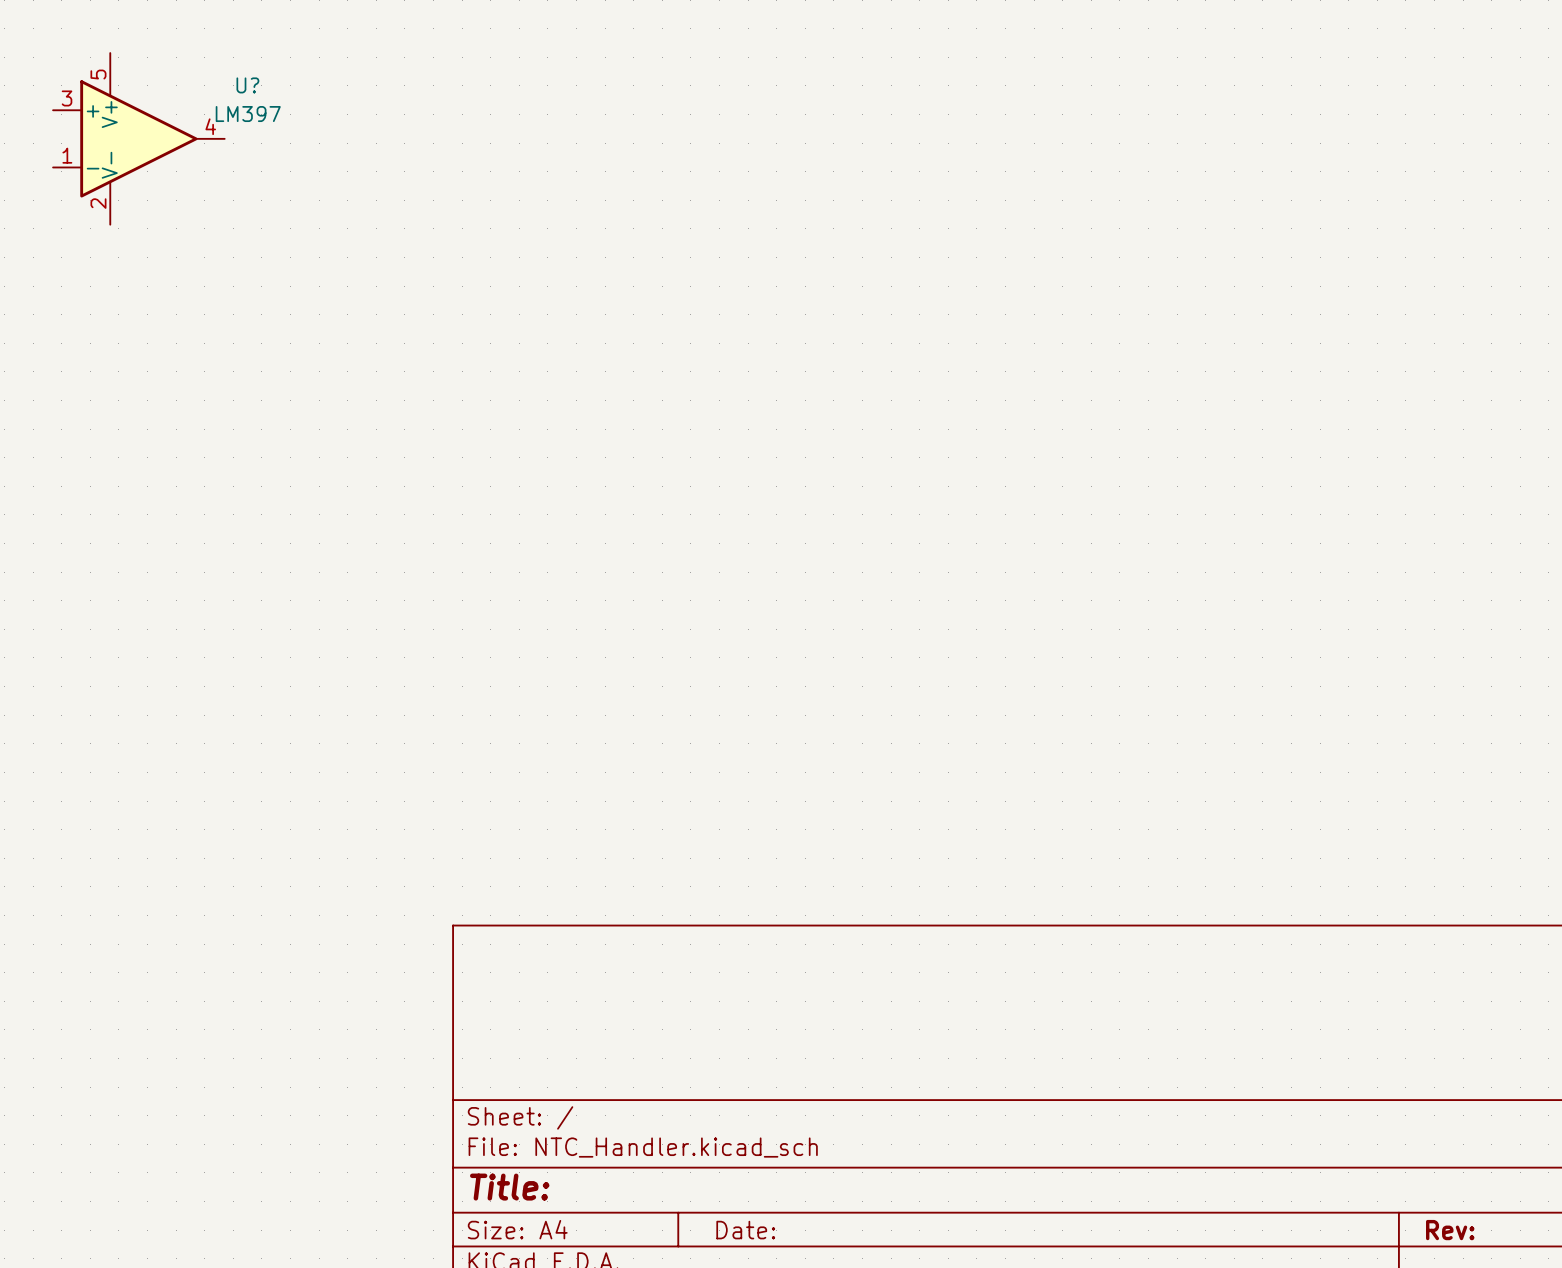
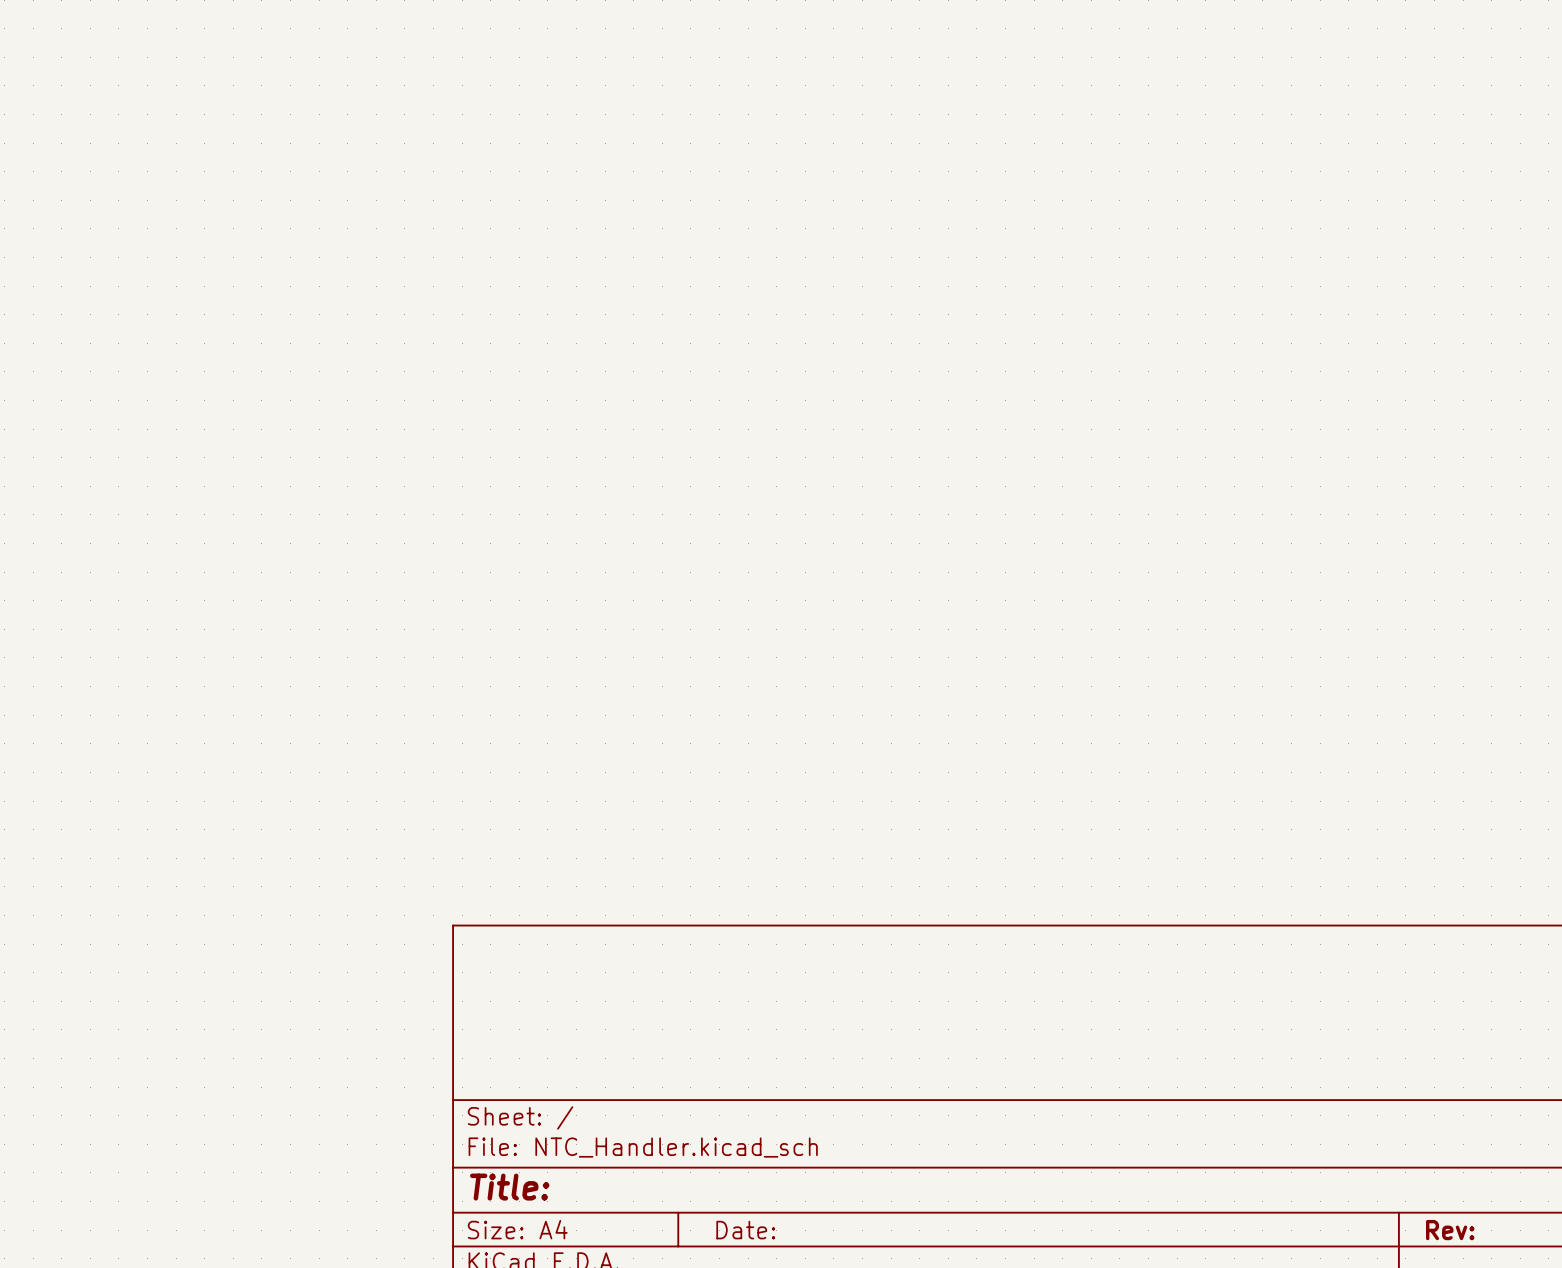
U?: LM397 (138, 138) -> none

